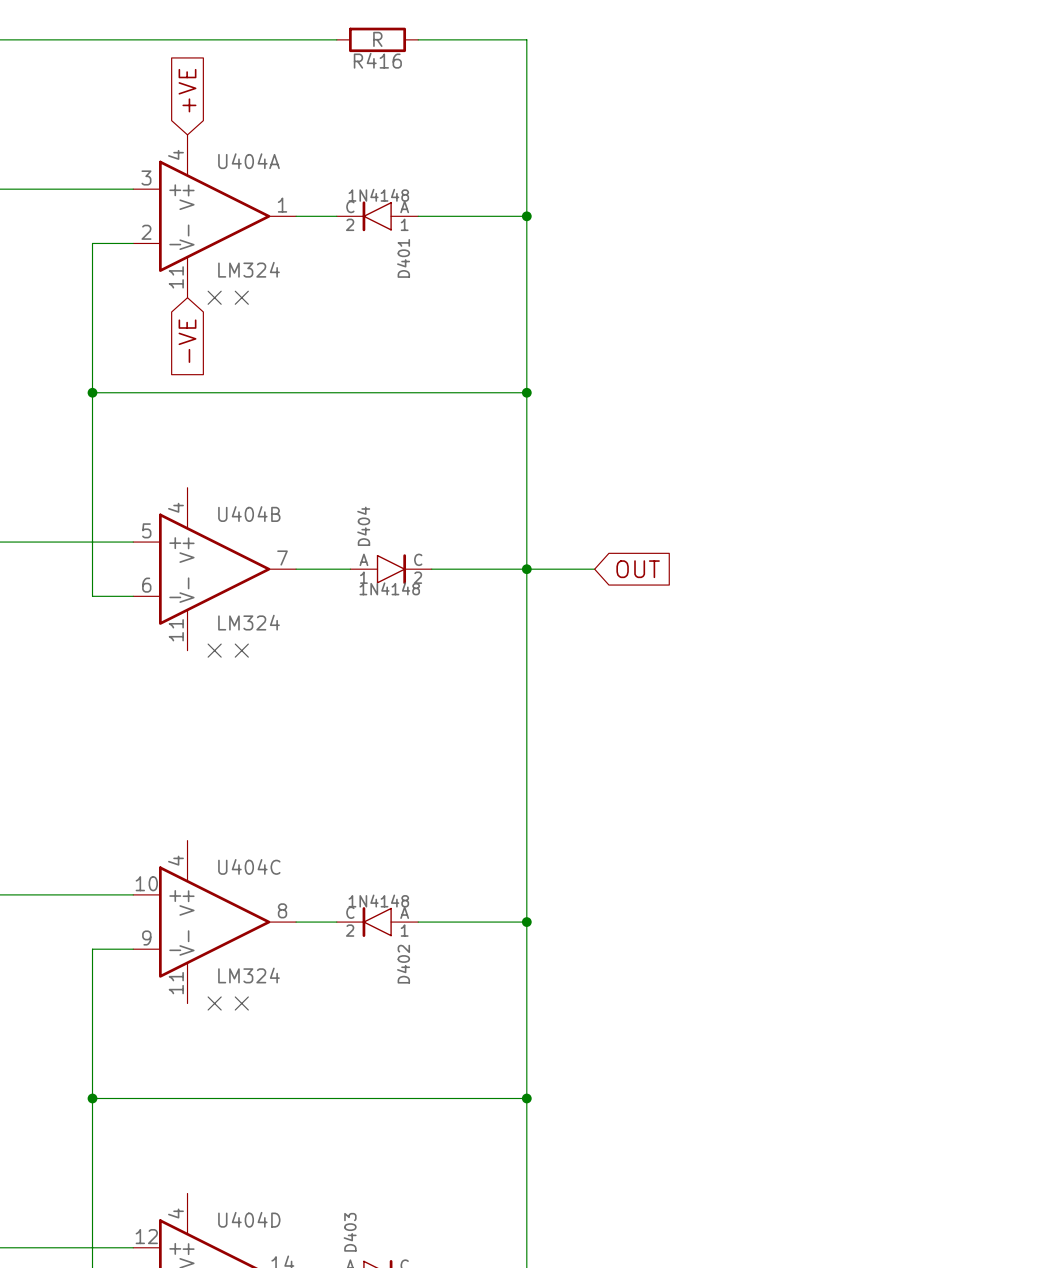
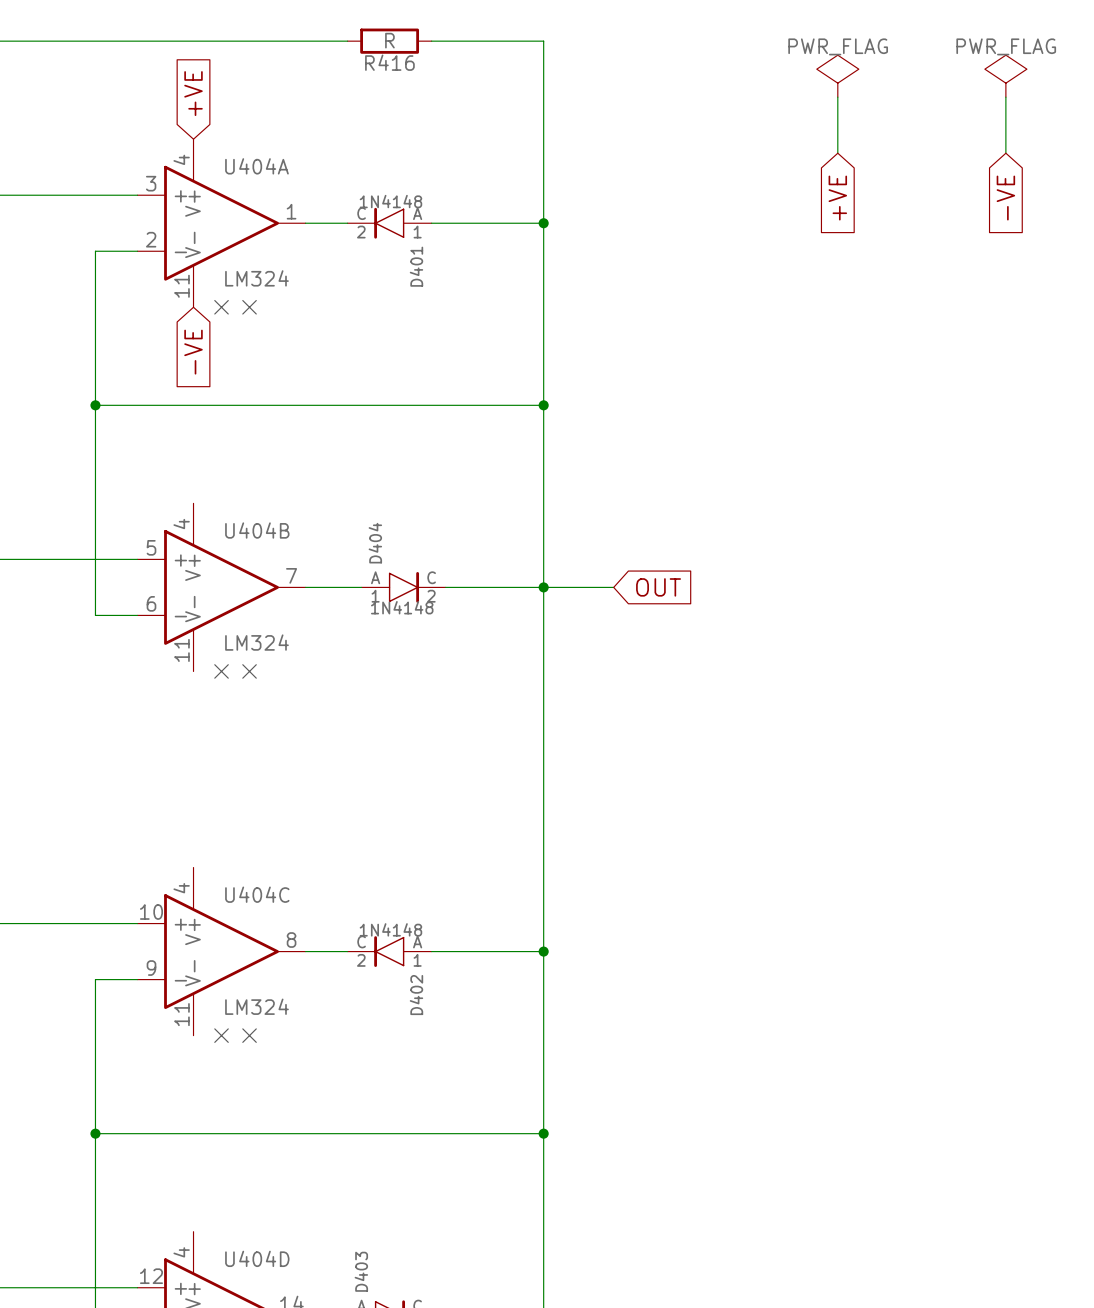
power symbol: none -> PWR_FLAG (837, 76)
power symbol: none -> PWR_FLAG (1005, 76)
wire: none -> (837, 97) (837, 153)
wire: none -> (1005, 97) (1005, 153)
global label: none -> +VE (837, 198)
global label: none -> -VE (1005, 198)

